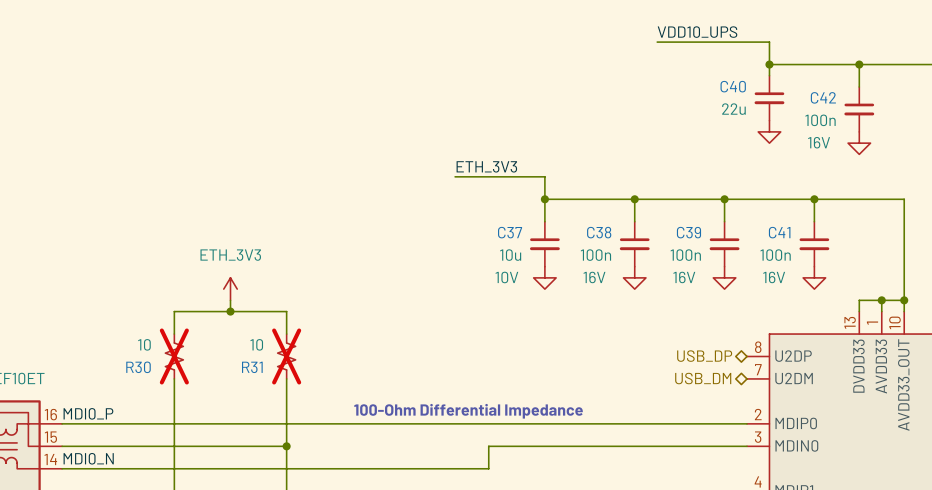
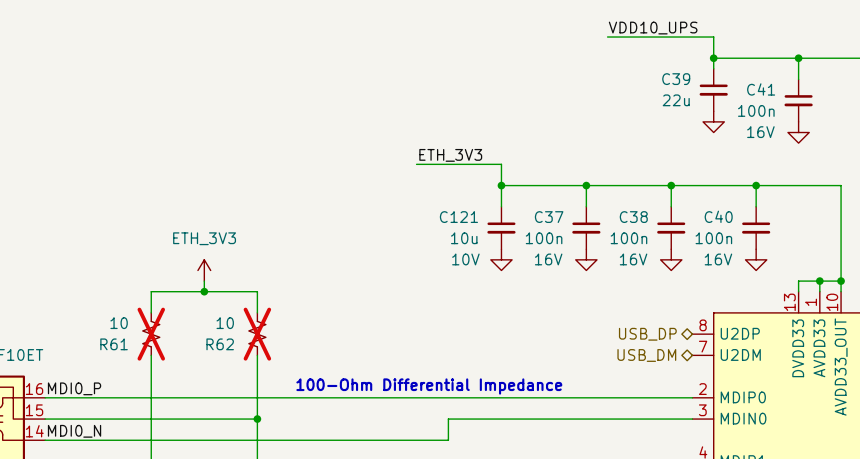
C40 name: C40 (733, 86) -> C39 (676, 79)
C42 name: C42 (823, 97) -> C41 (761, 89)
C37 name: C37 (510, 232) -> C121 (458, 217)
C38 name: C38 (599, 232) -> C37 (549, 217)
C39 name: C39 (688, 232) -> C38 (633, 217)
C41 name: C41 (779, 232) -> C40 (718, 216)
R30 name: R30 (138, 367) -> R61 (114, 344)
R31 name: R31 (252, 367) -> R62 (220, 344)

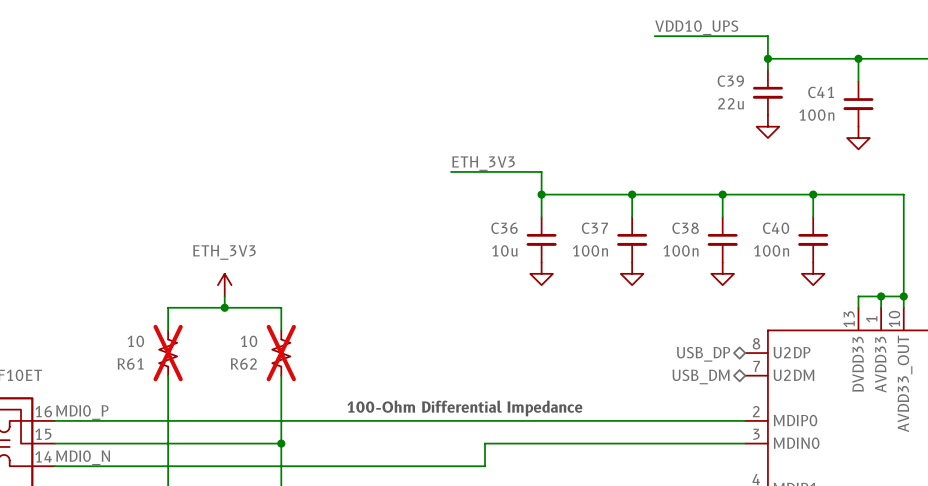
C41 text: 16V (760, 132) -> none
C121 name: C121 (458, 217) -> C36 (504, 228)
C121 text: 10V (465, 259) -> none
C37 text: 16V (548, 259) -> none
C38 text: 16V (633, 259) -> none
C40 text: 16V (718, 259) -> none

